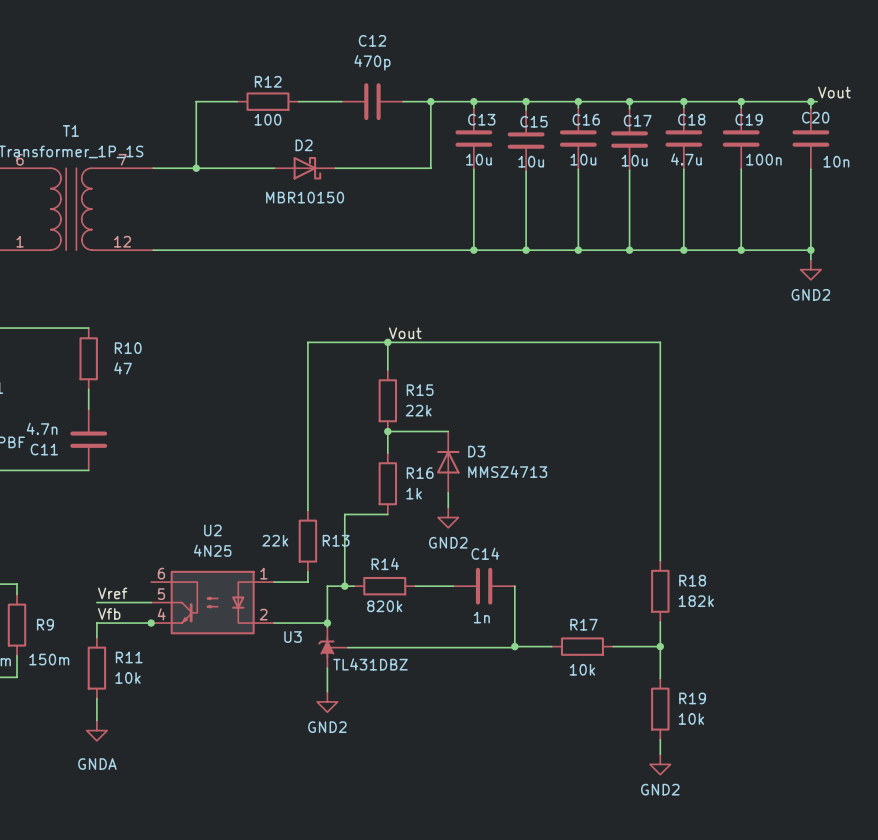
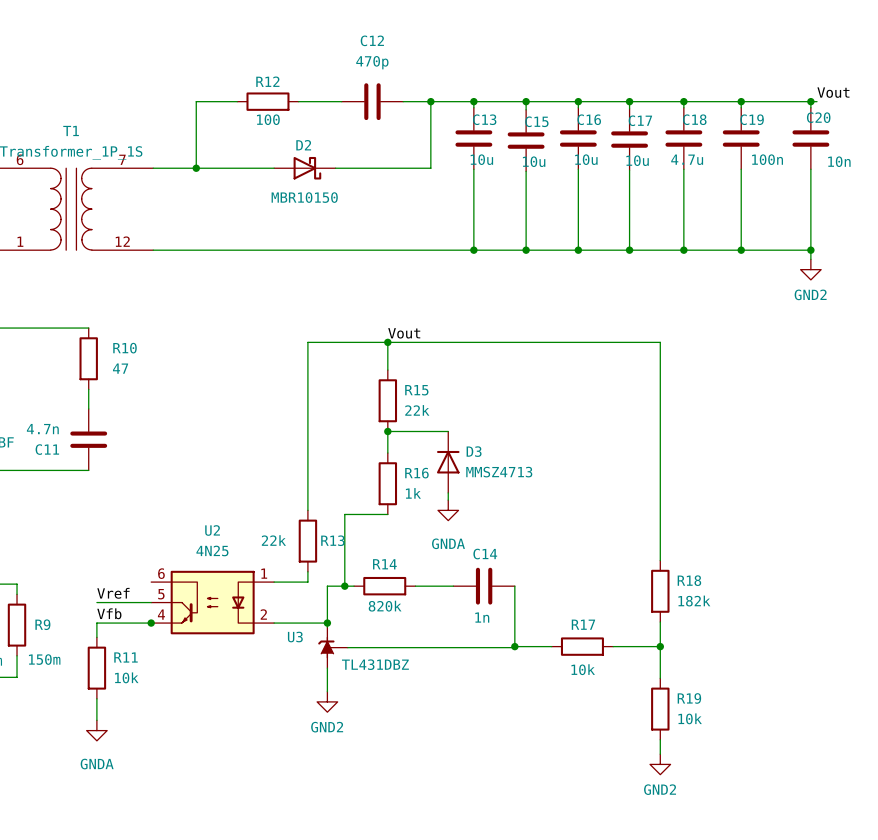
power symbol: GND2 (448, 517) -> GNDA (448, 510)

